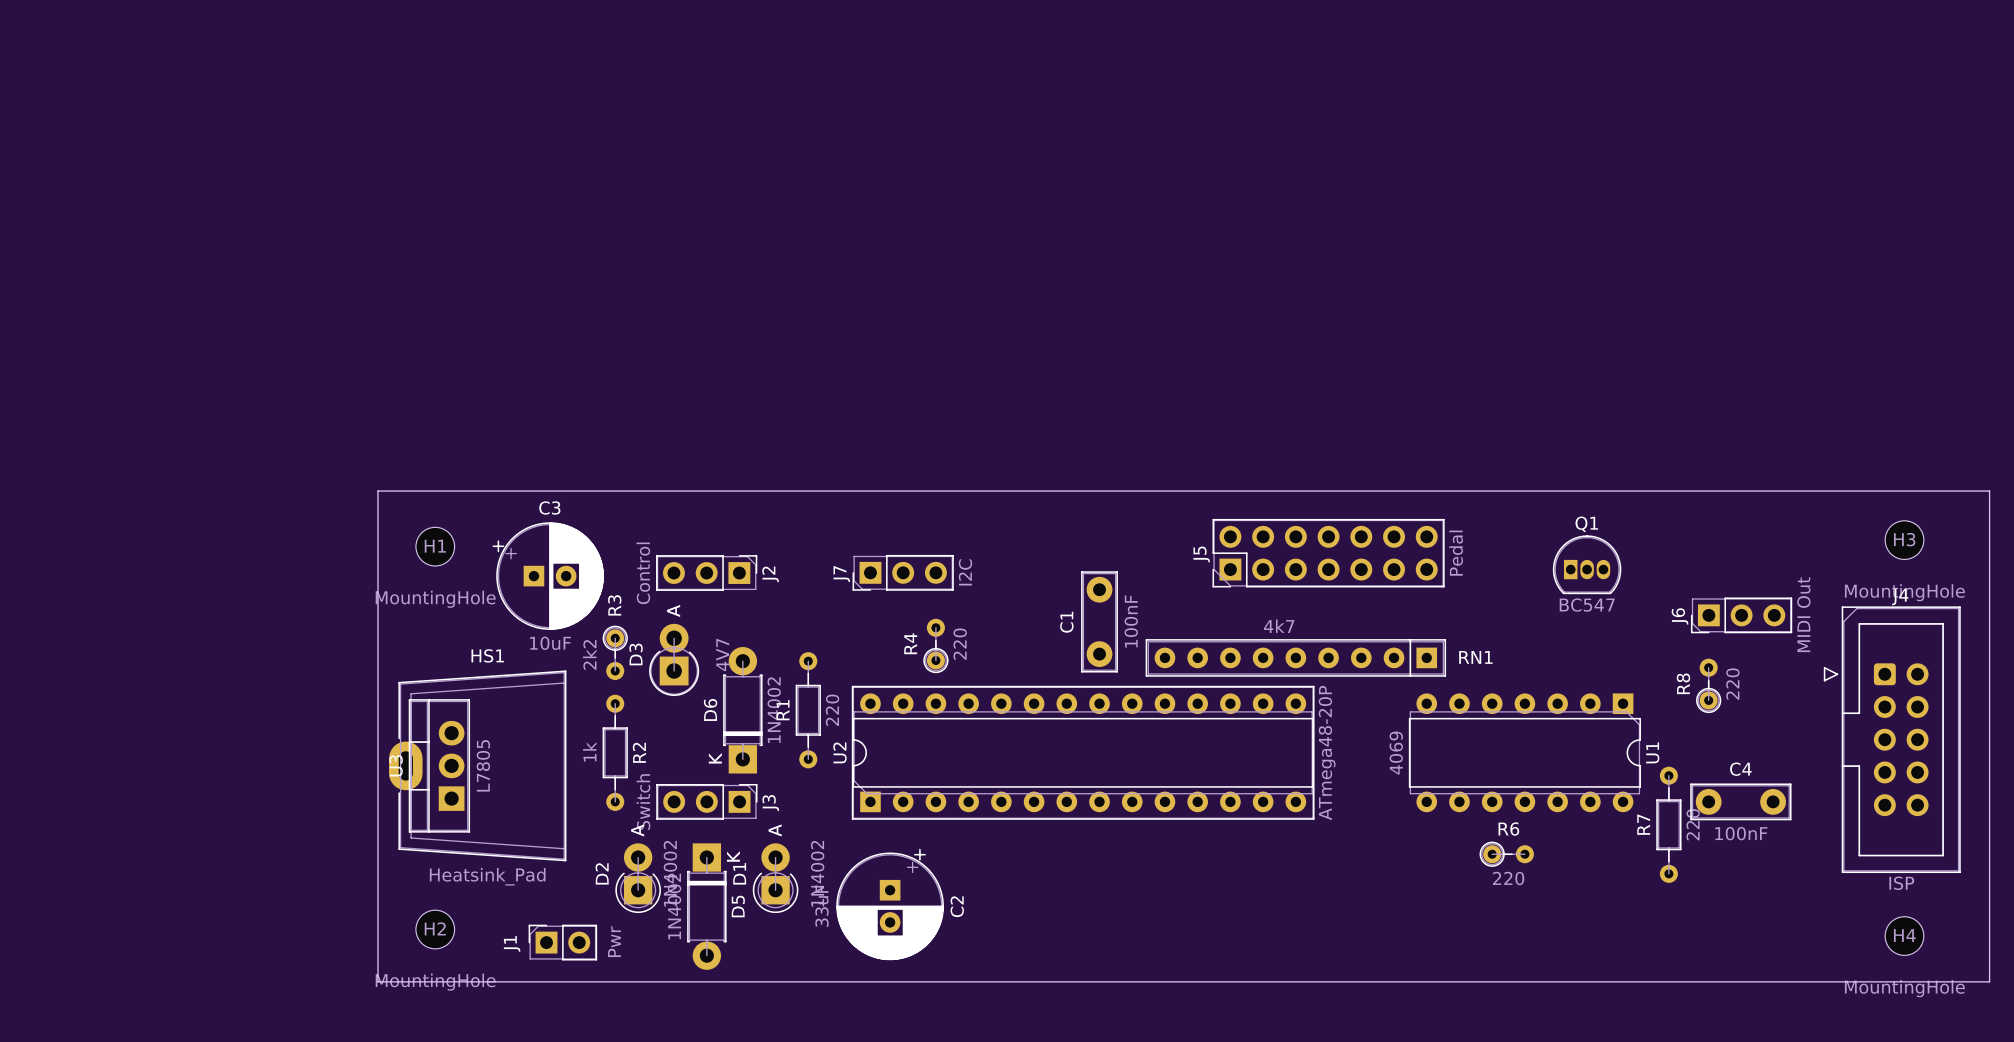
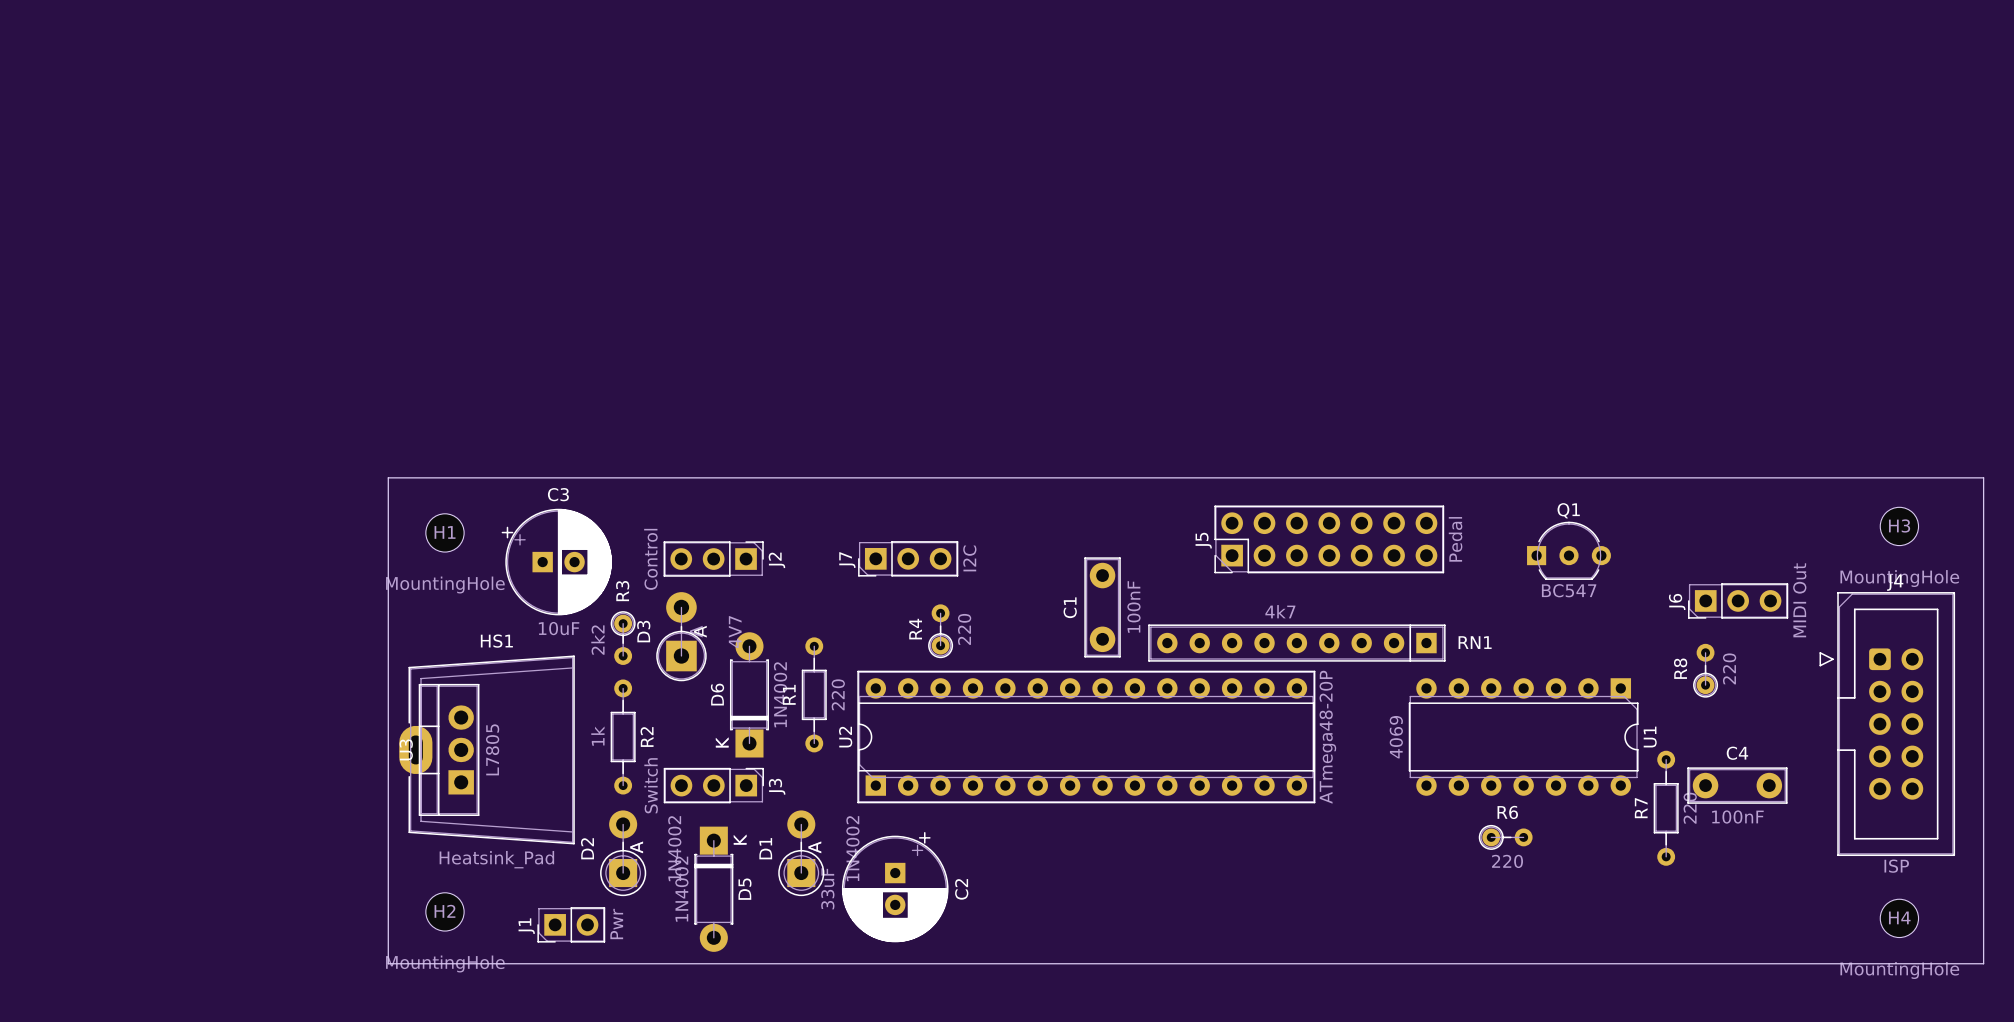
Q1 footprint: [1552, 535, 1622, 595] -> [1527, 521, 1611, 580]
D3 footprint: [649, 623, 700, 697] -> [656, 592, 707, 682]
D2 footprint: [615, 843, 661, 914] -> [600, 810, 647, 897]
D1 footprint: [752, 843, 799, 914] -> [778, 810, 825, 897]
J1 footprint: [528, 924, 598, 961] -> [537, 907, 606, 943]

